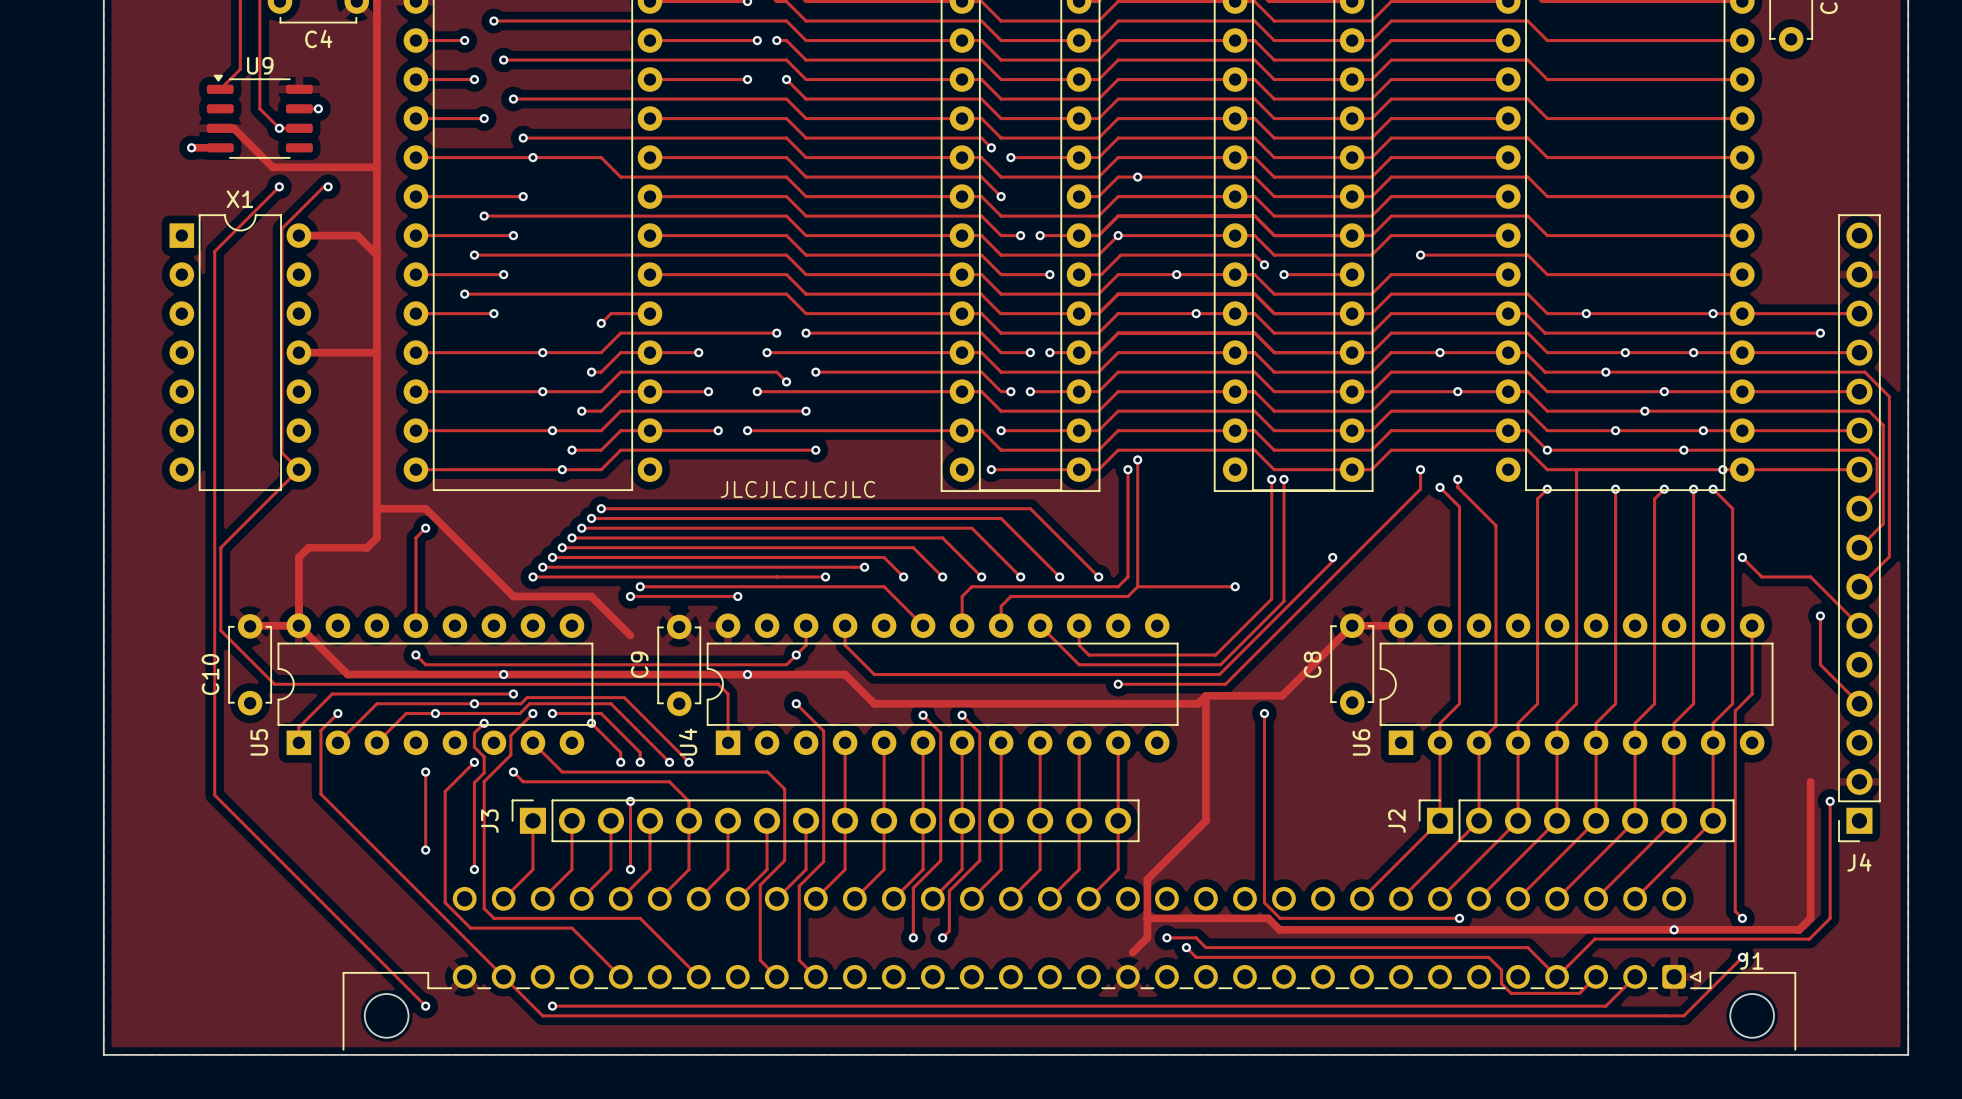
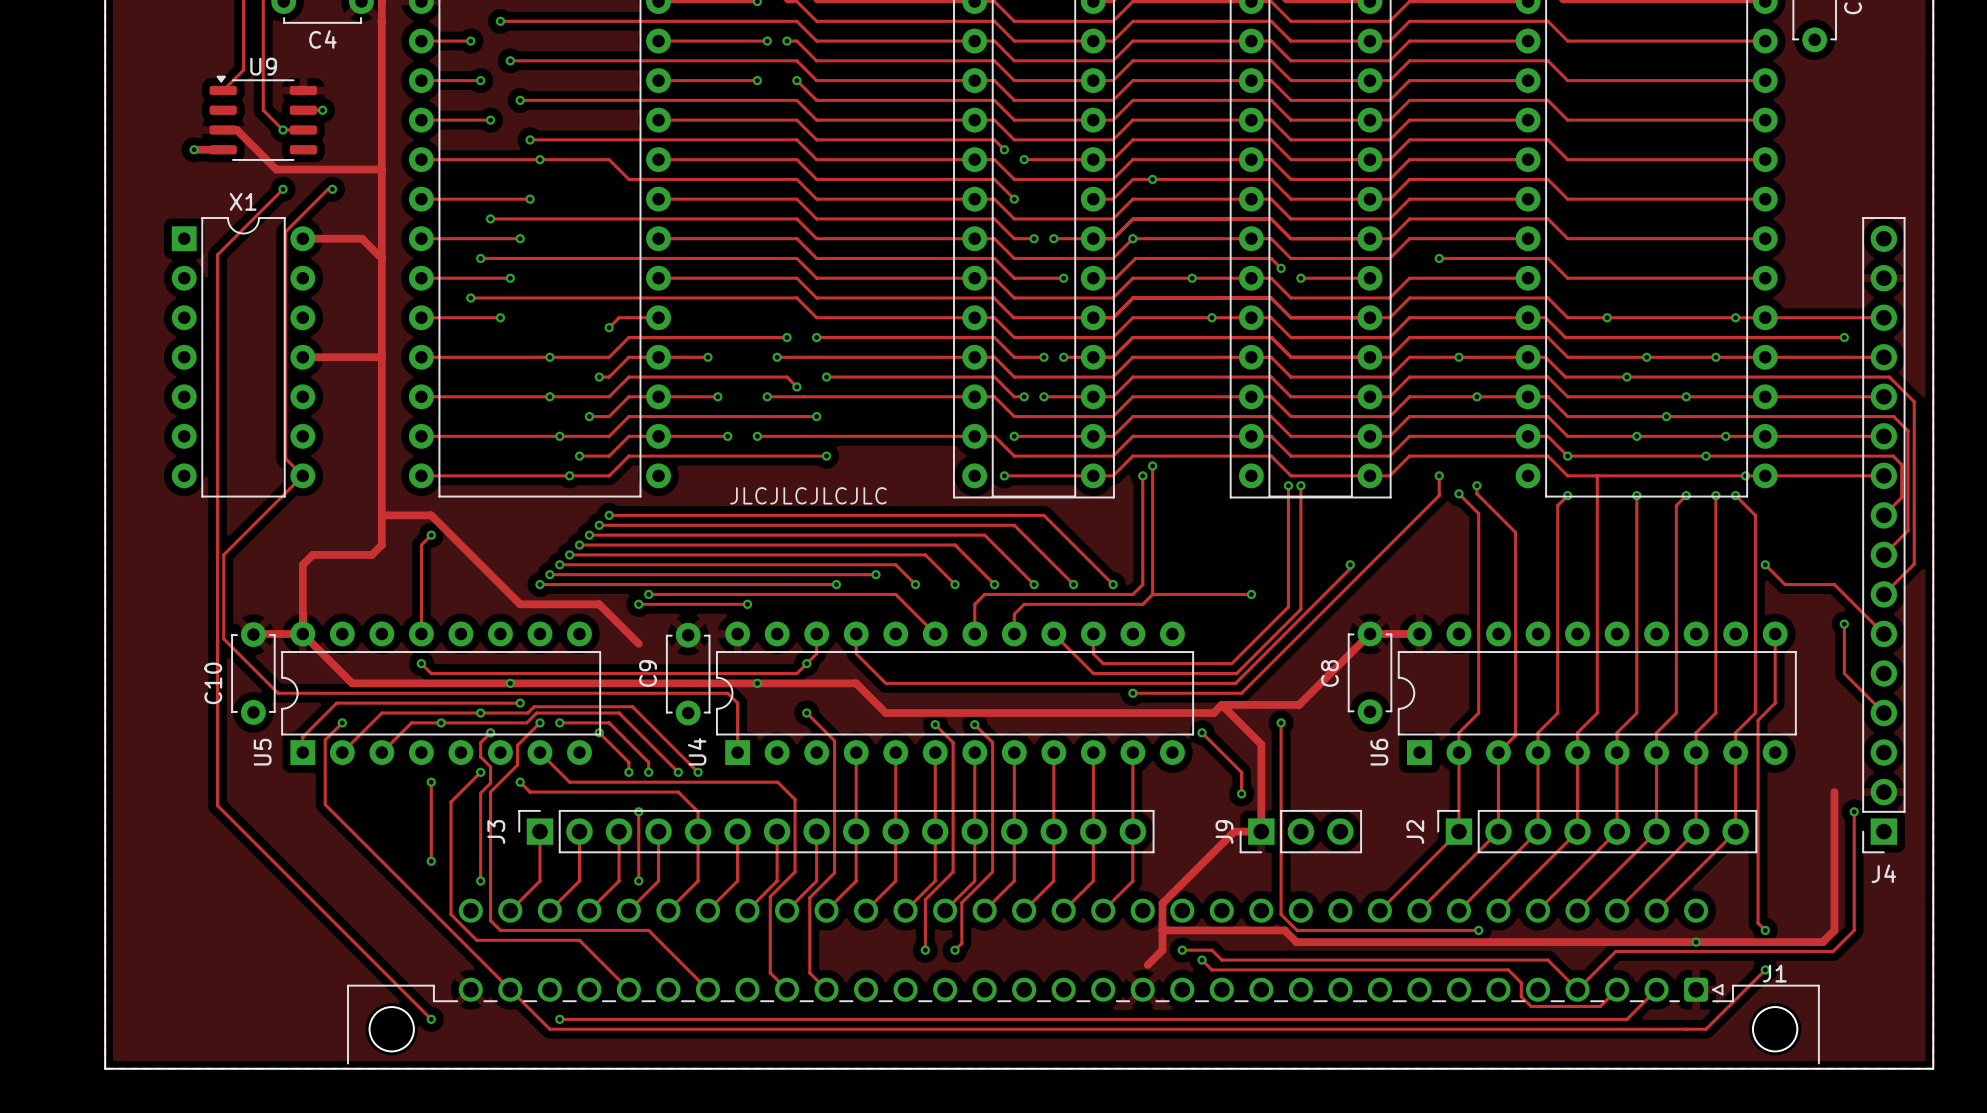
track: (1205, 695) (1205, 820) (1147, 879) (1147, 891) -> (1221, 704) (1261, 744) (1261, 831) (1234, 831) (1162, 903)
track: none -> (1202, 732) (1241, 772) (1241, 793)
via: none -> (1202, 732)
via: none -> (1241, 793)
J9: none -> (1300, 831)

